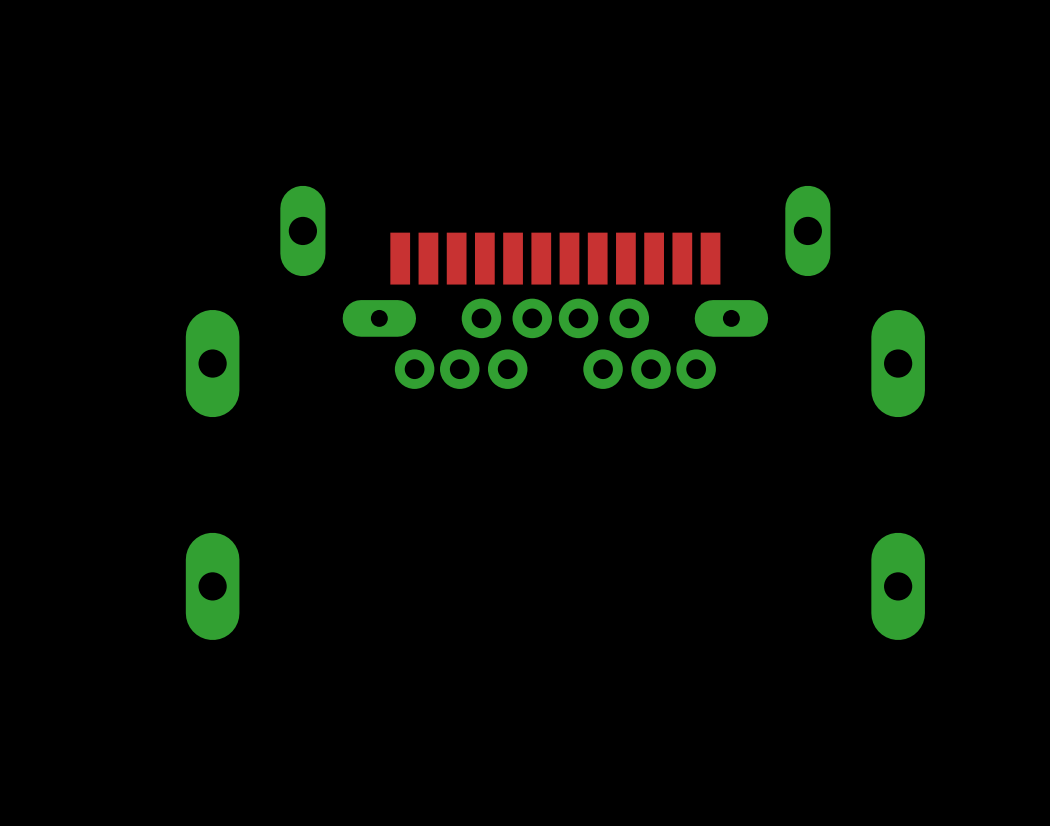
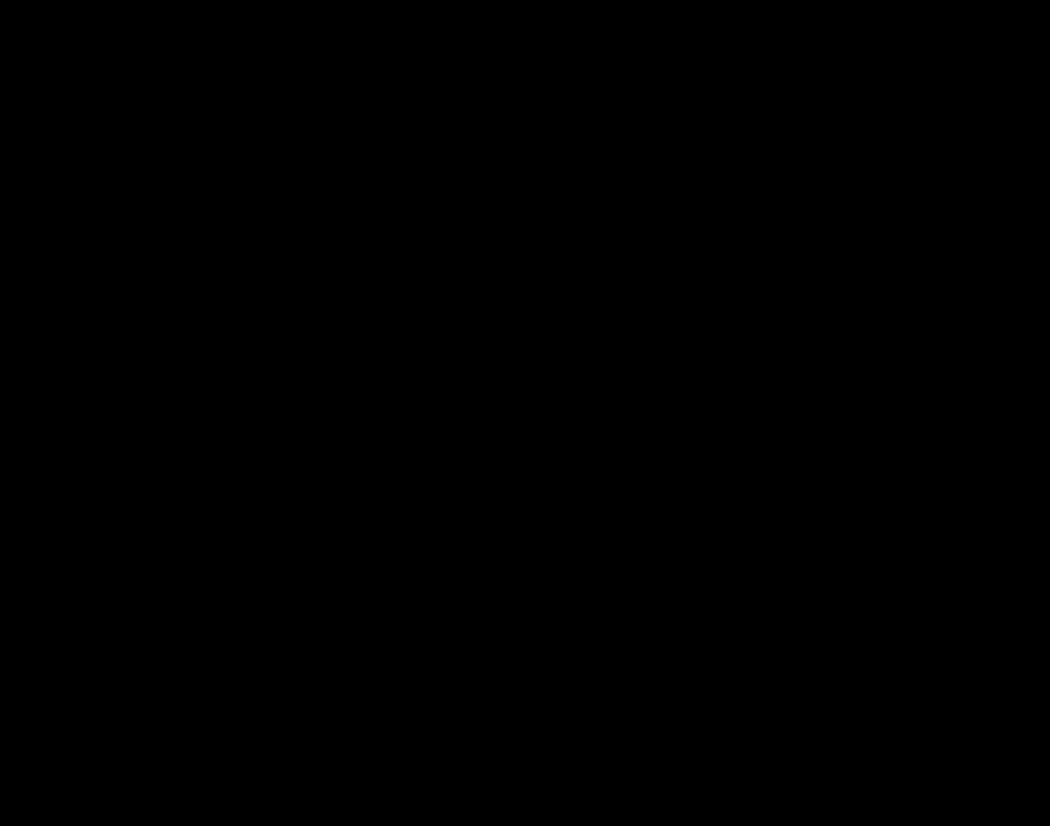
part: (555, 412) -> none

